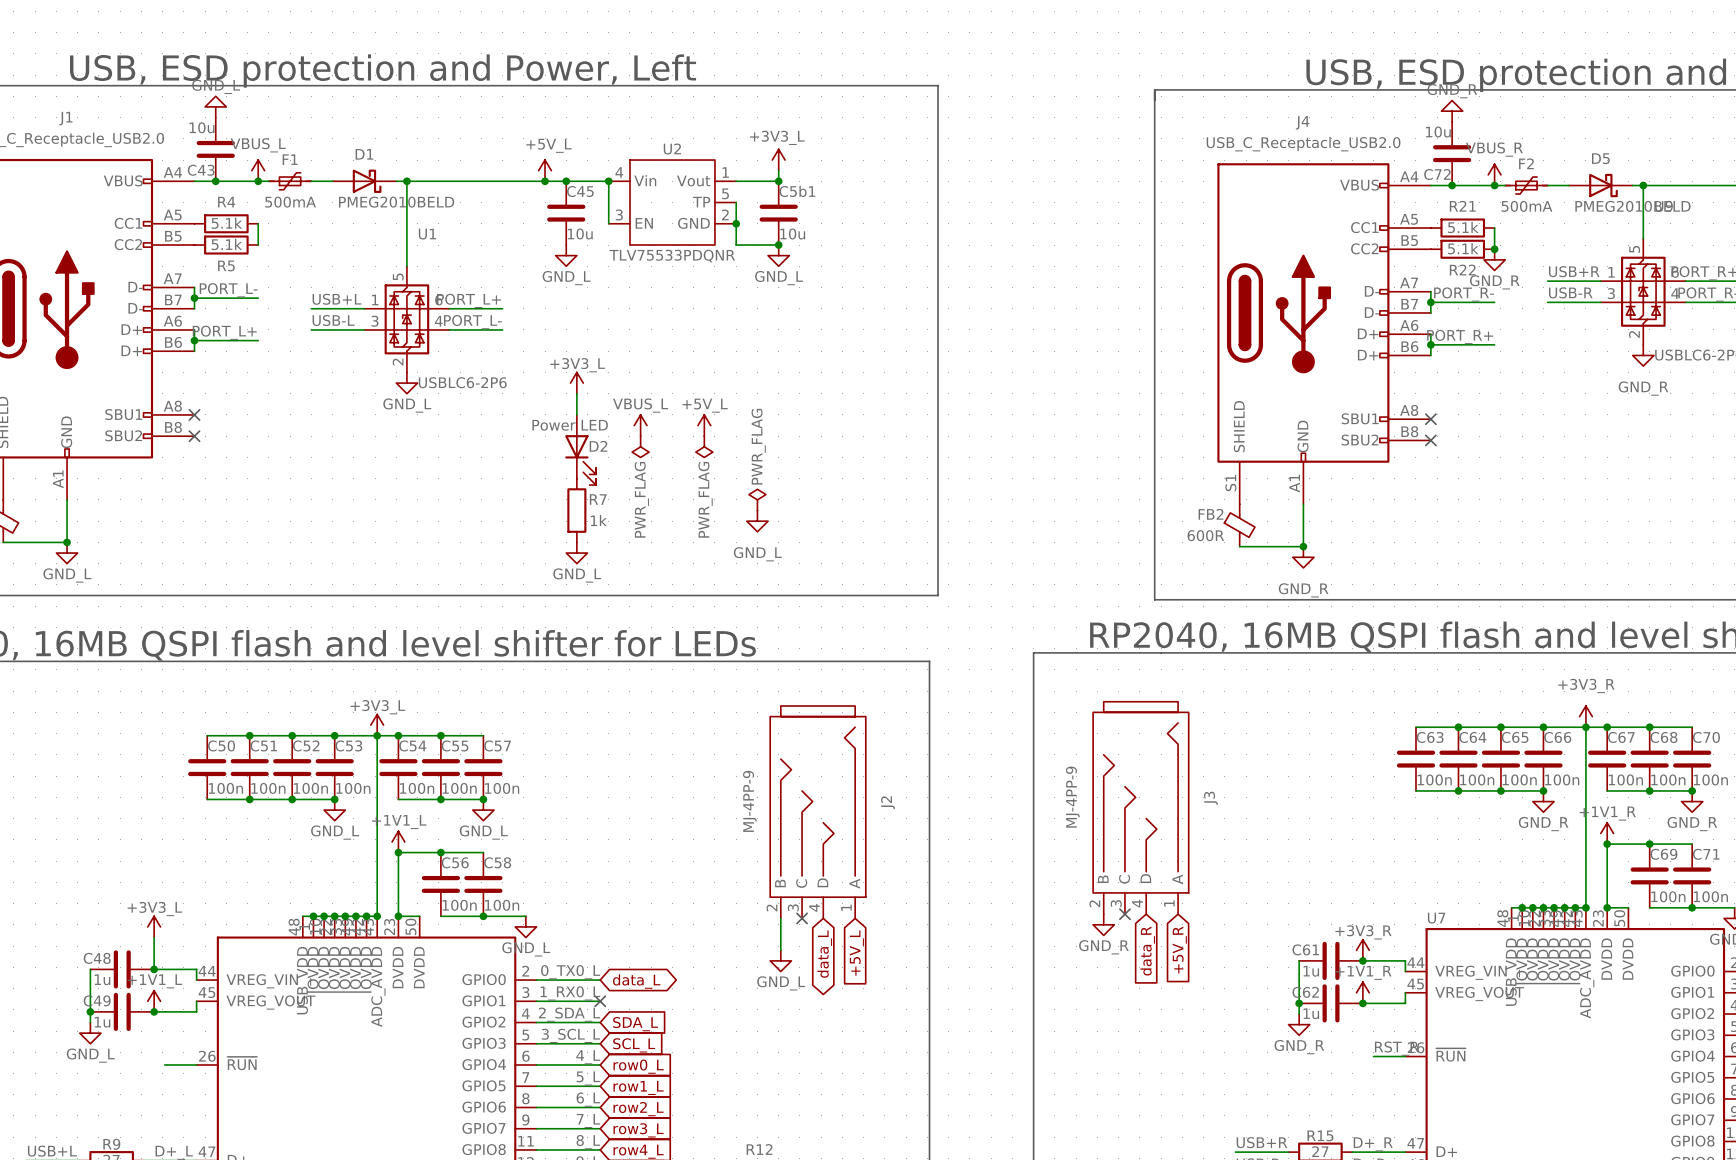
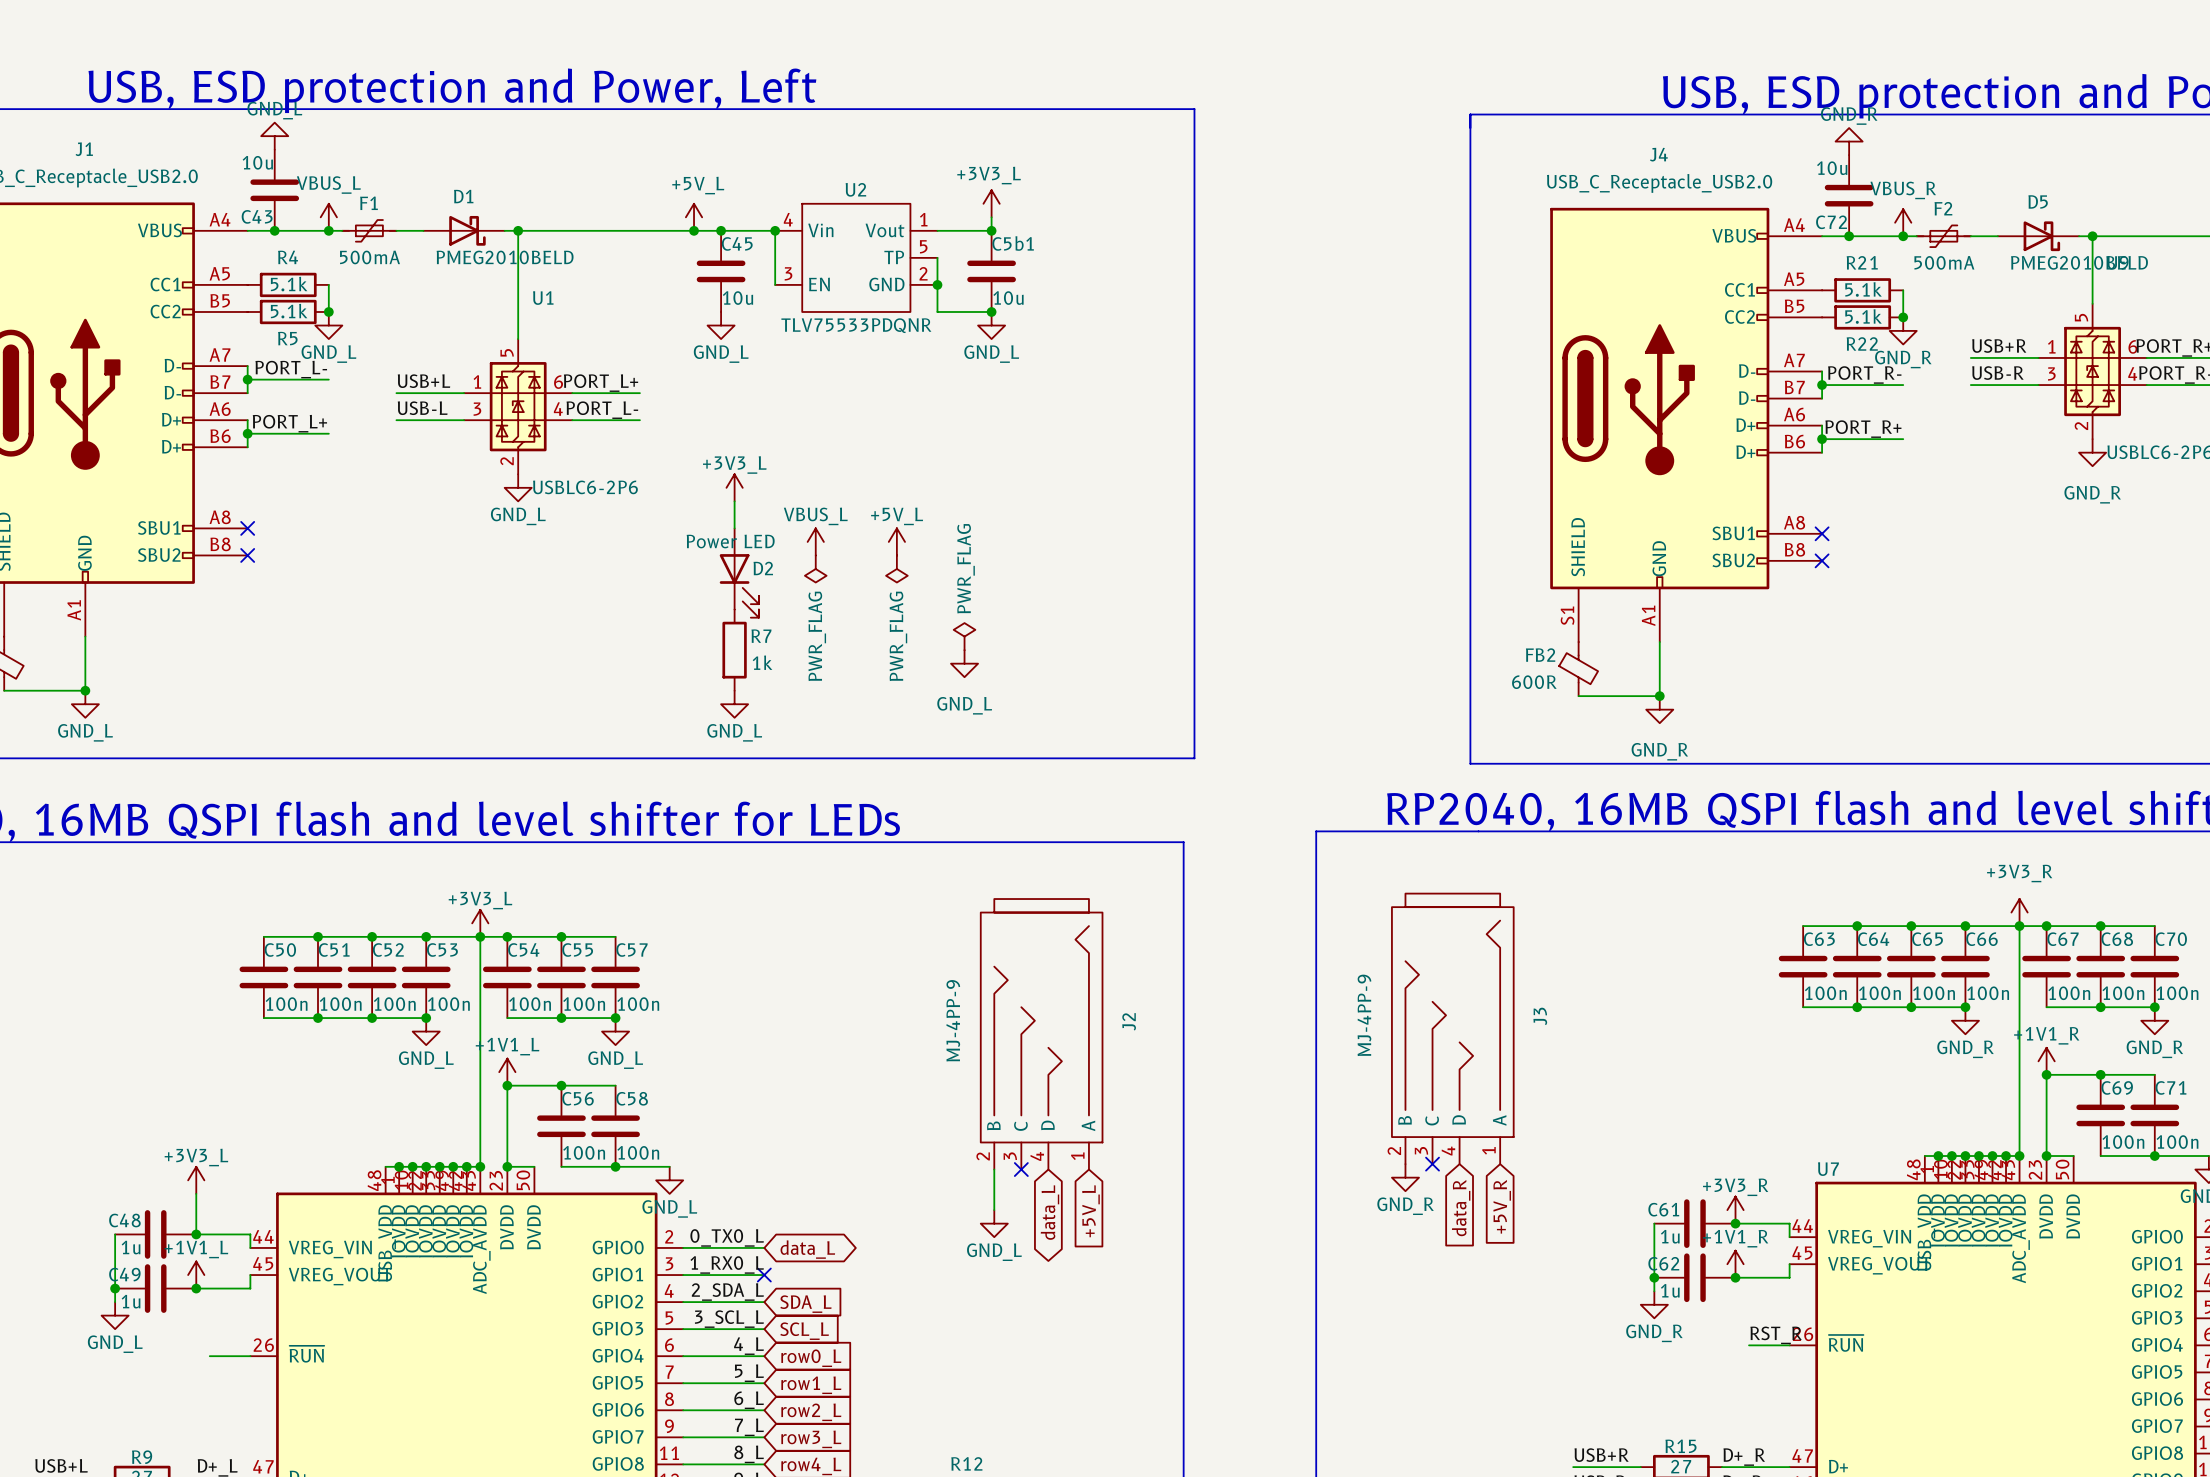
junction: none -> (328, 311)
power symbol: none -> GND_L (328, 325)

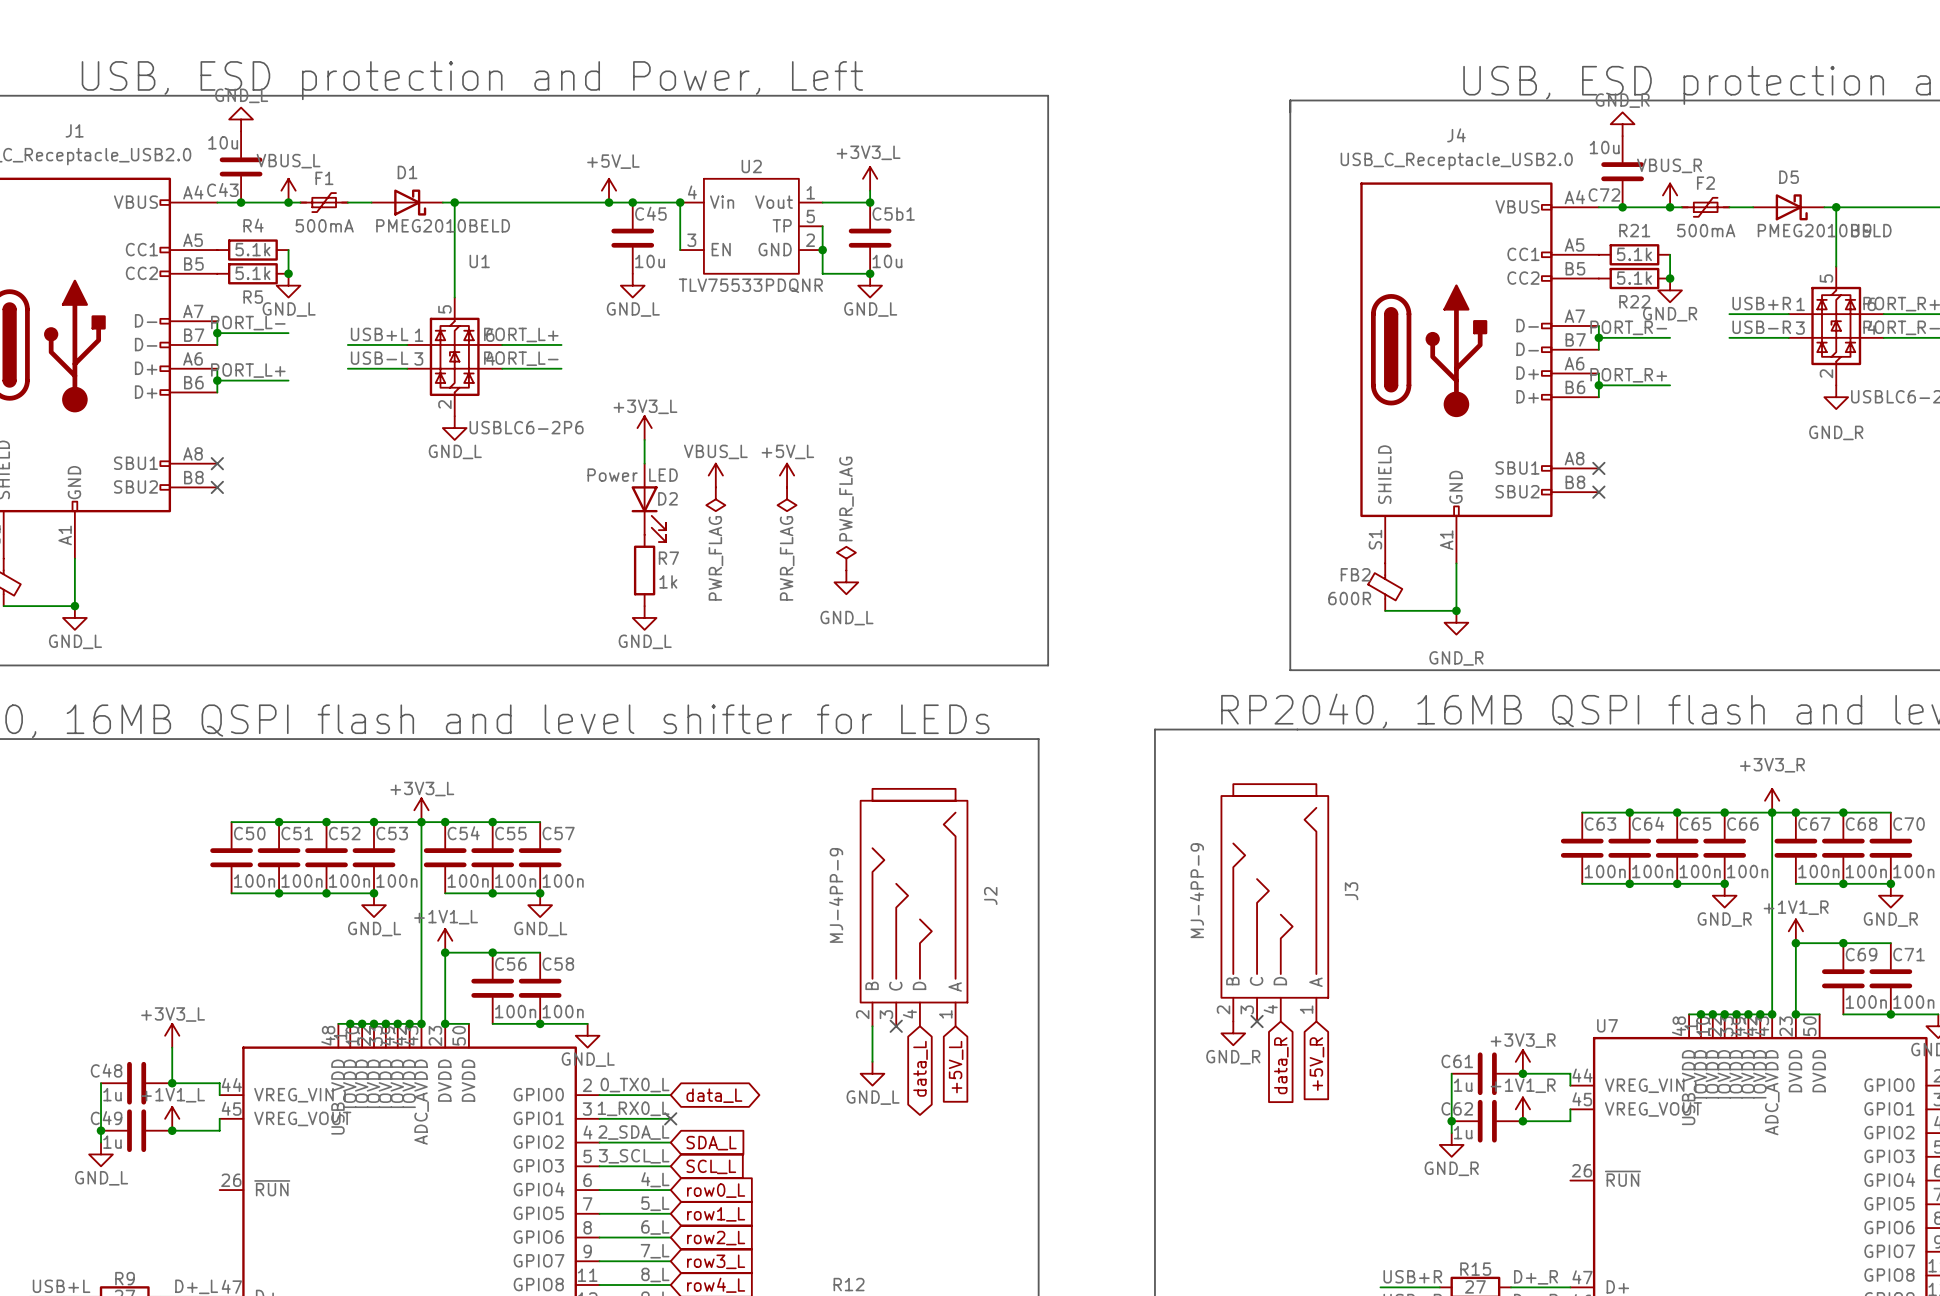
label: RST_R (1776, 1335) -> none
wire: (1749, 1345) (1789, 1345) -> none
wire: (209, 1356) (250, 1356) -> none

